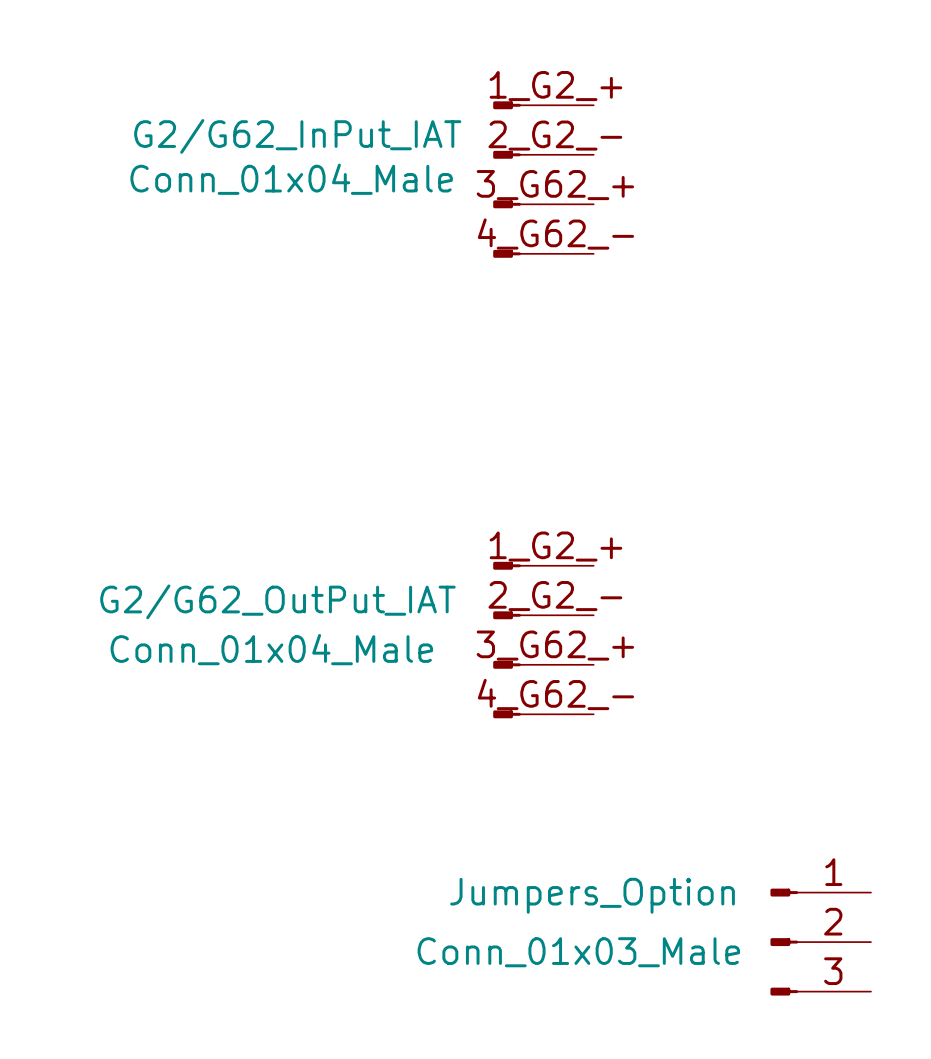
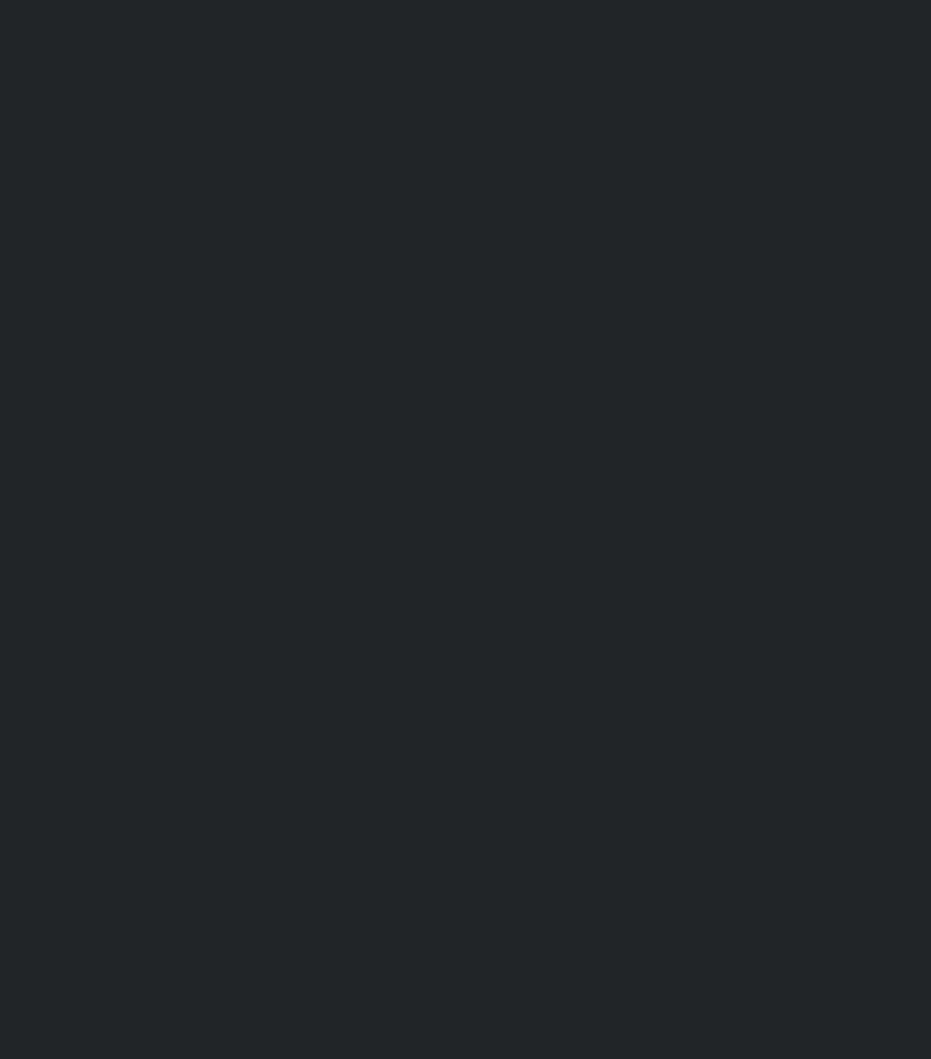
G2/G62_InPut_IAT: Conn_01x04_Male (543, 179) -> none
G2/G62_OutPut_IAT: Conn_01x04_Male (543, 640) -> none
Jumpers_Option: Conn_01x03_Male (820, 942) -> none

